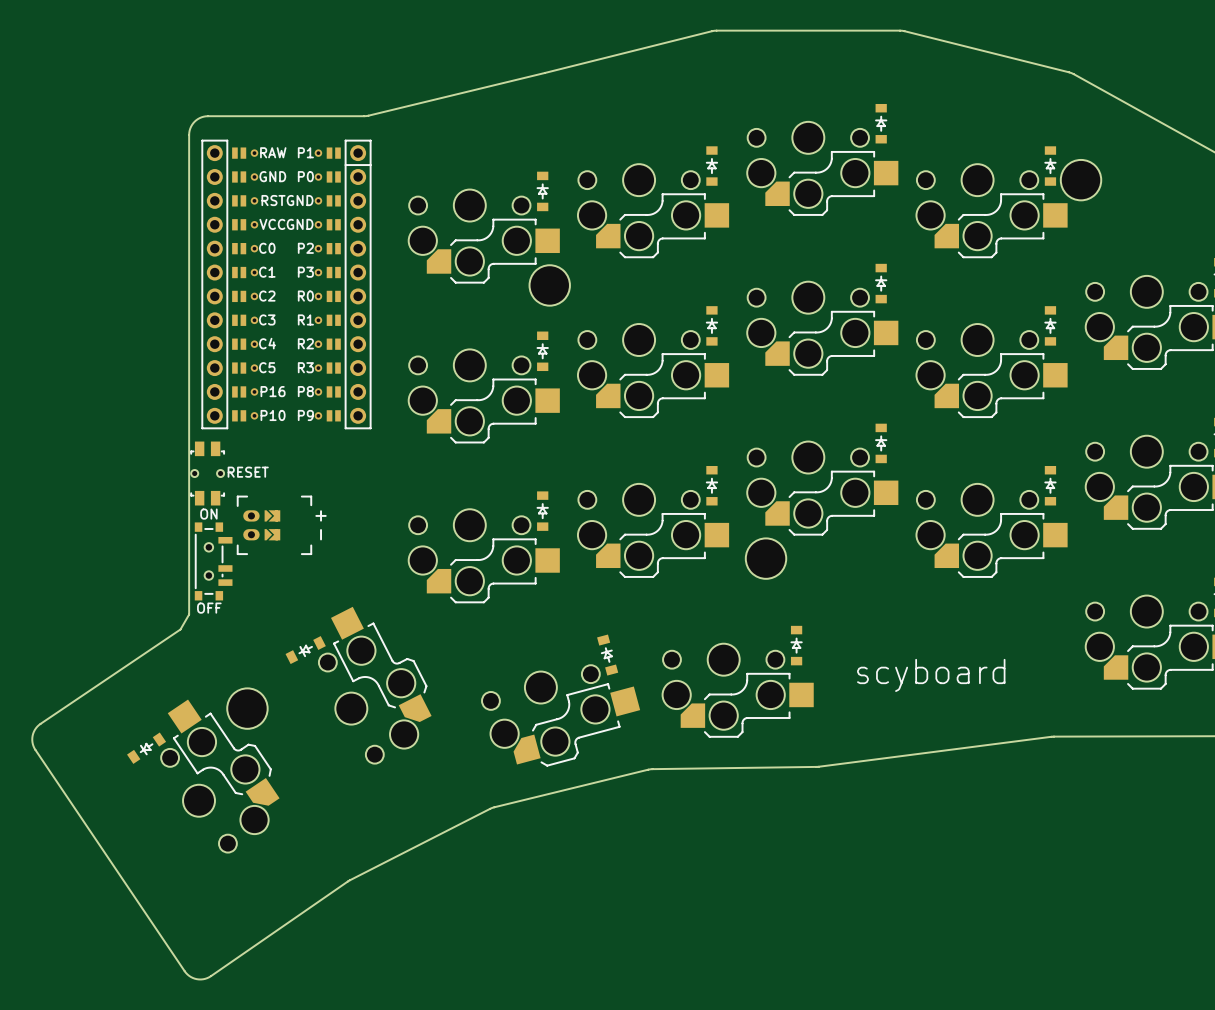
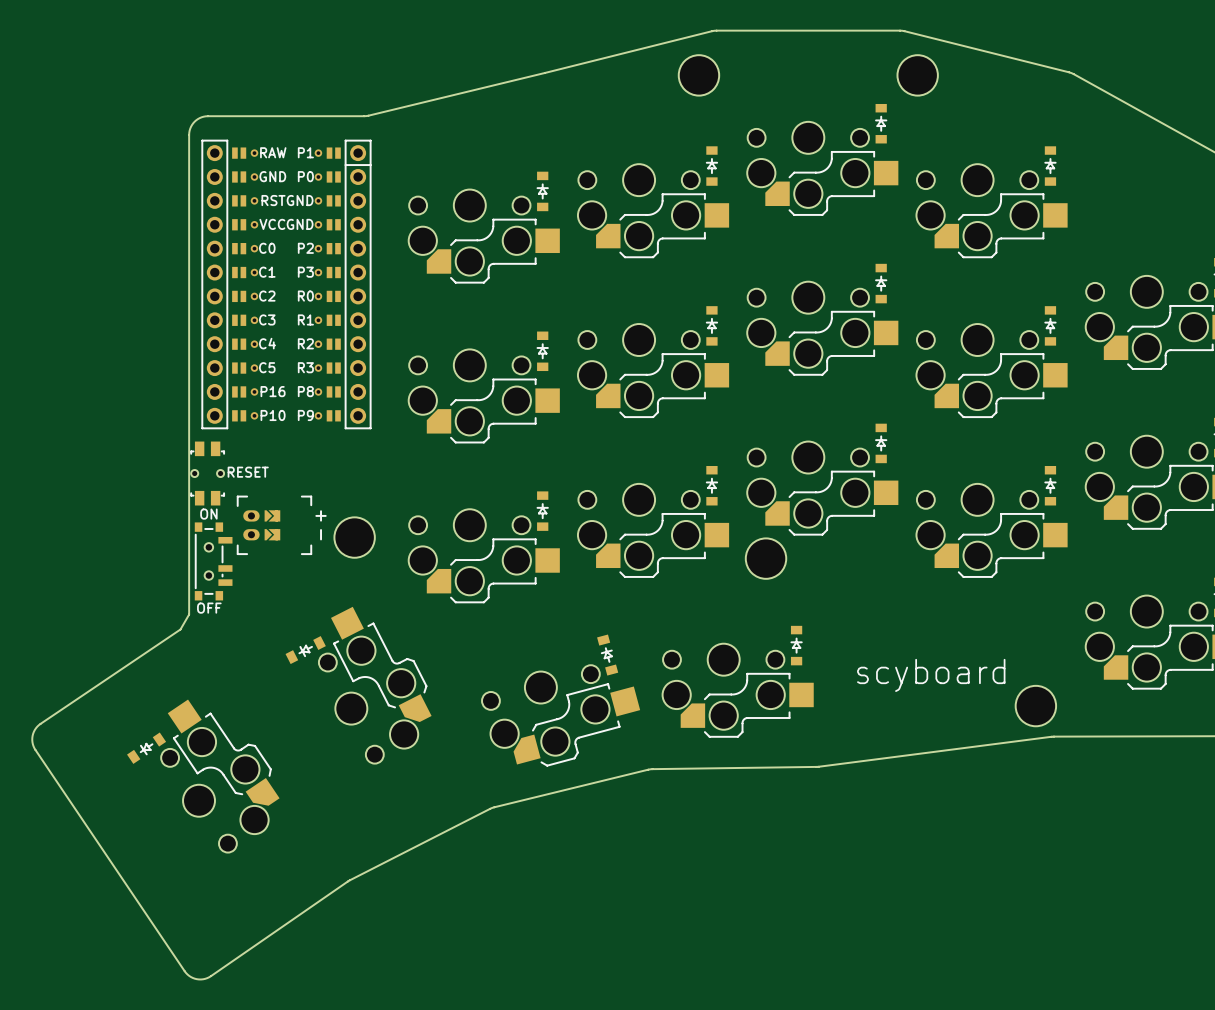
part: none -> (698, 75)
part: none -> (917, 75)
part: (1081, 180) -> none
part: (549, 285) -> none
part: none -> (354, 537)
part: none -> (1035, 706)
part: (247, 708) -> none

